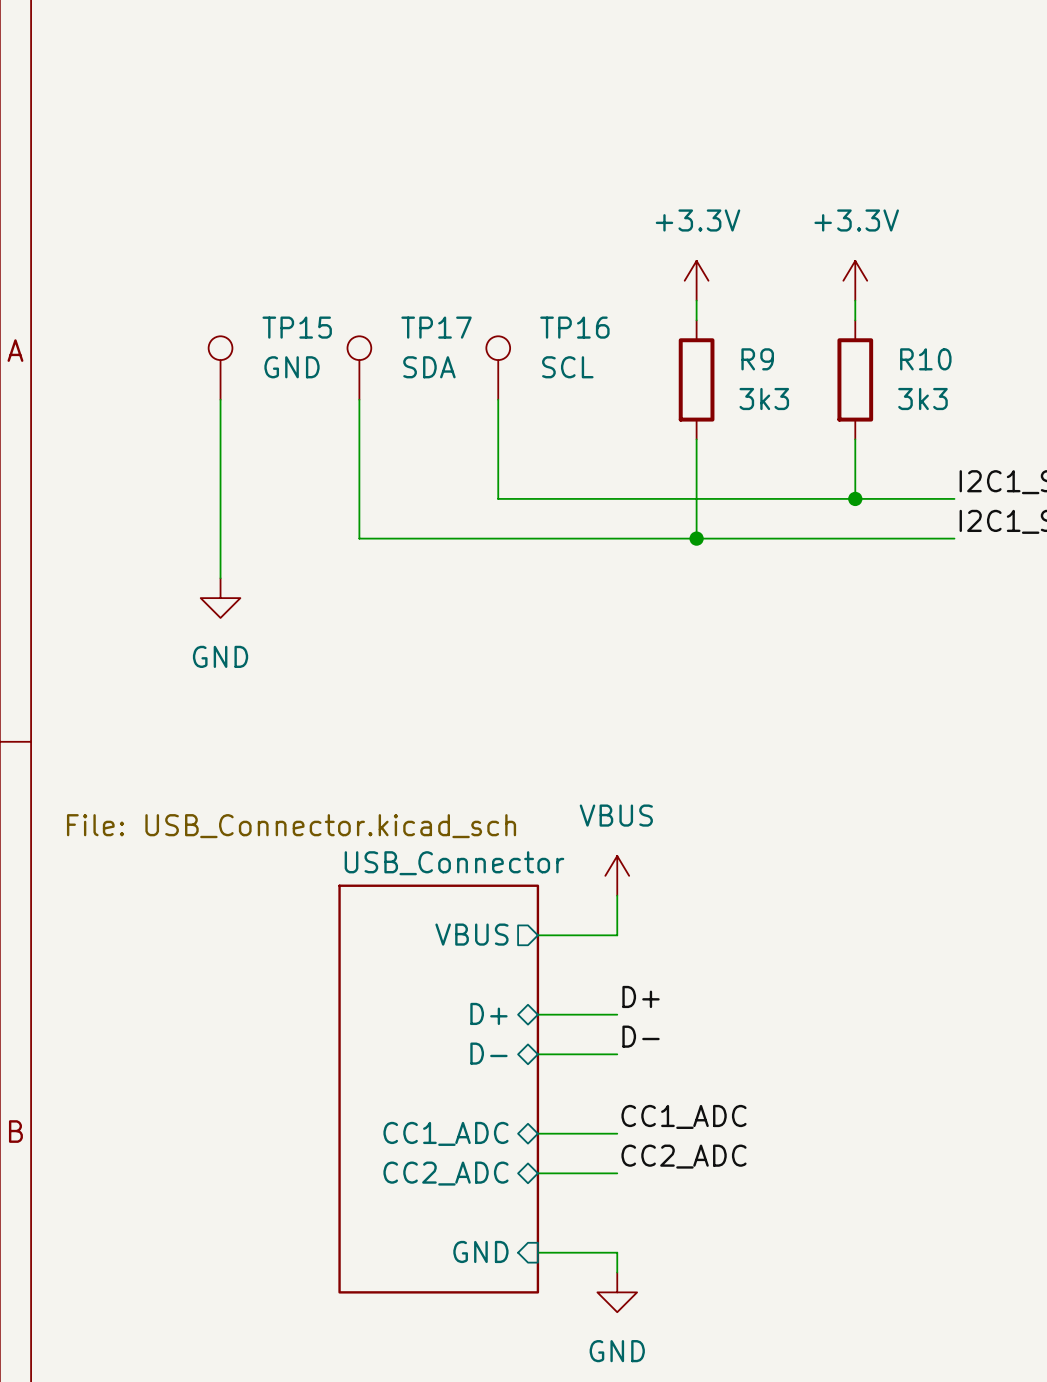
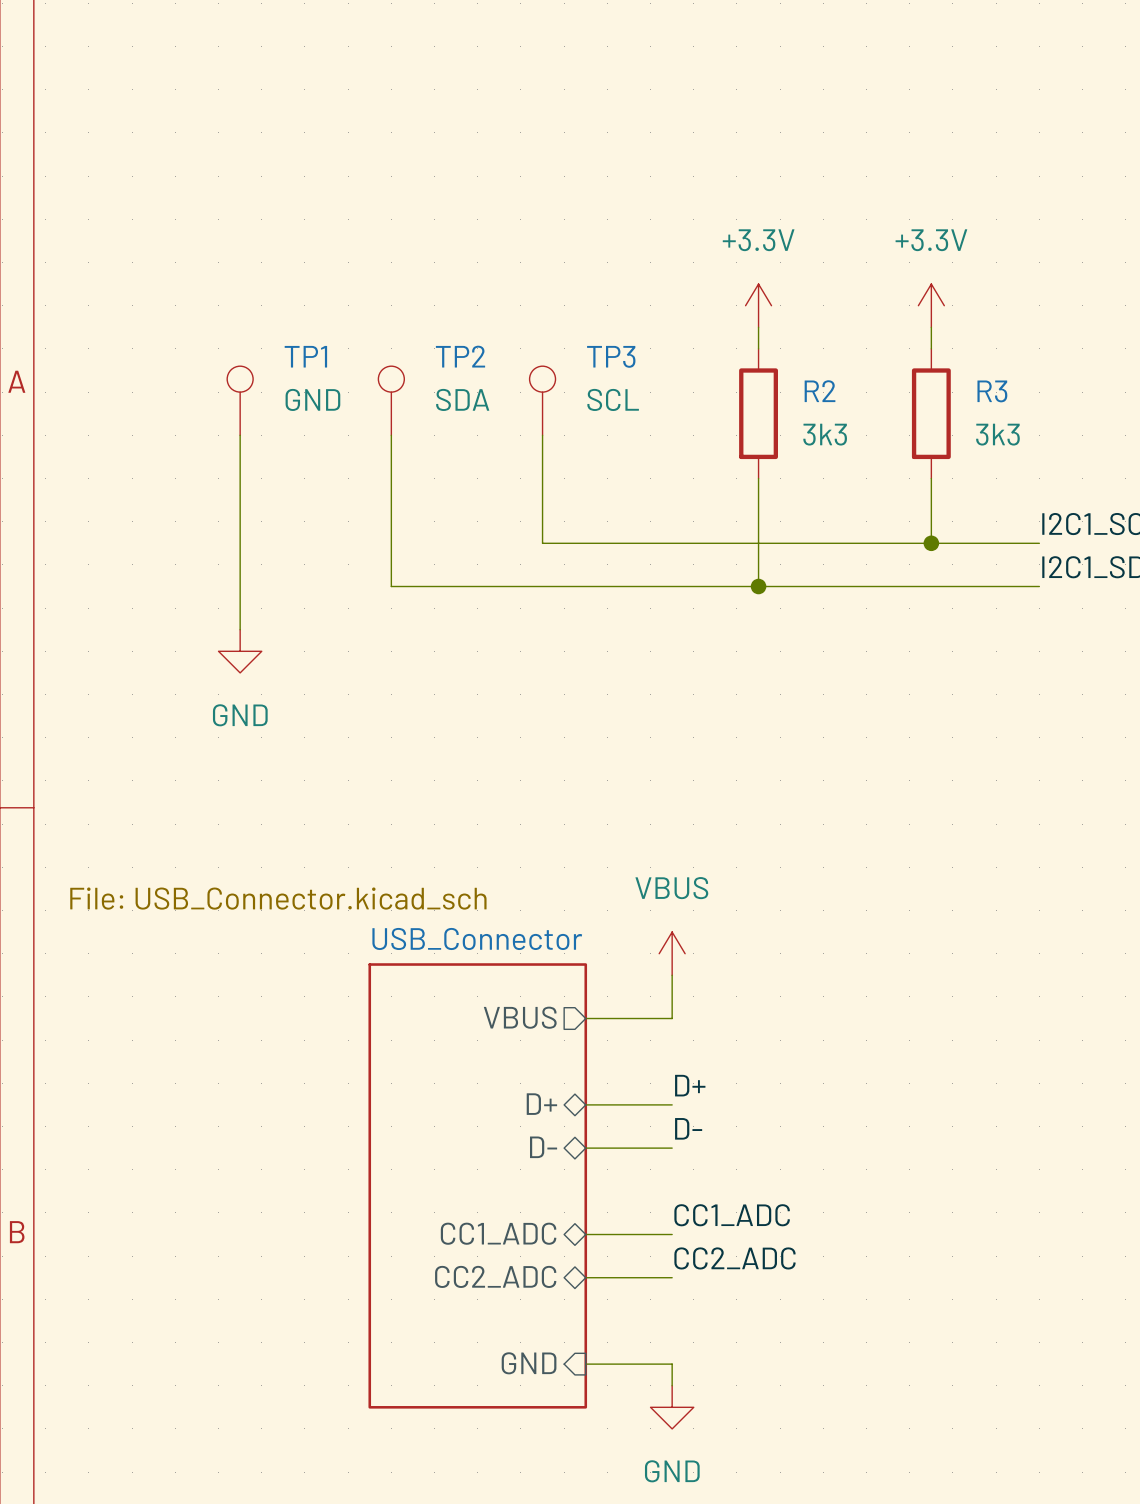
TP15 name: TP15 (297, 327) -> TP1 (305, 356)
TP17 name: TP17 (436, 327) -> TP2 (460, 356)
TP16 name: TP16 (574, 327) -> TP3 (611, 356)
R9 name: R9 (757, 359) -> R2 (820, 391)
R10 name: R10 (925, 359) -> R3 (992, 391)

